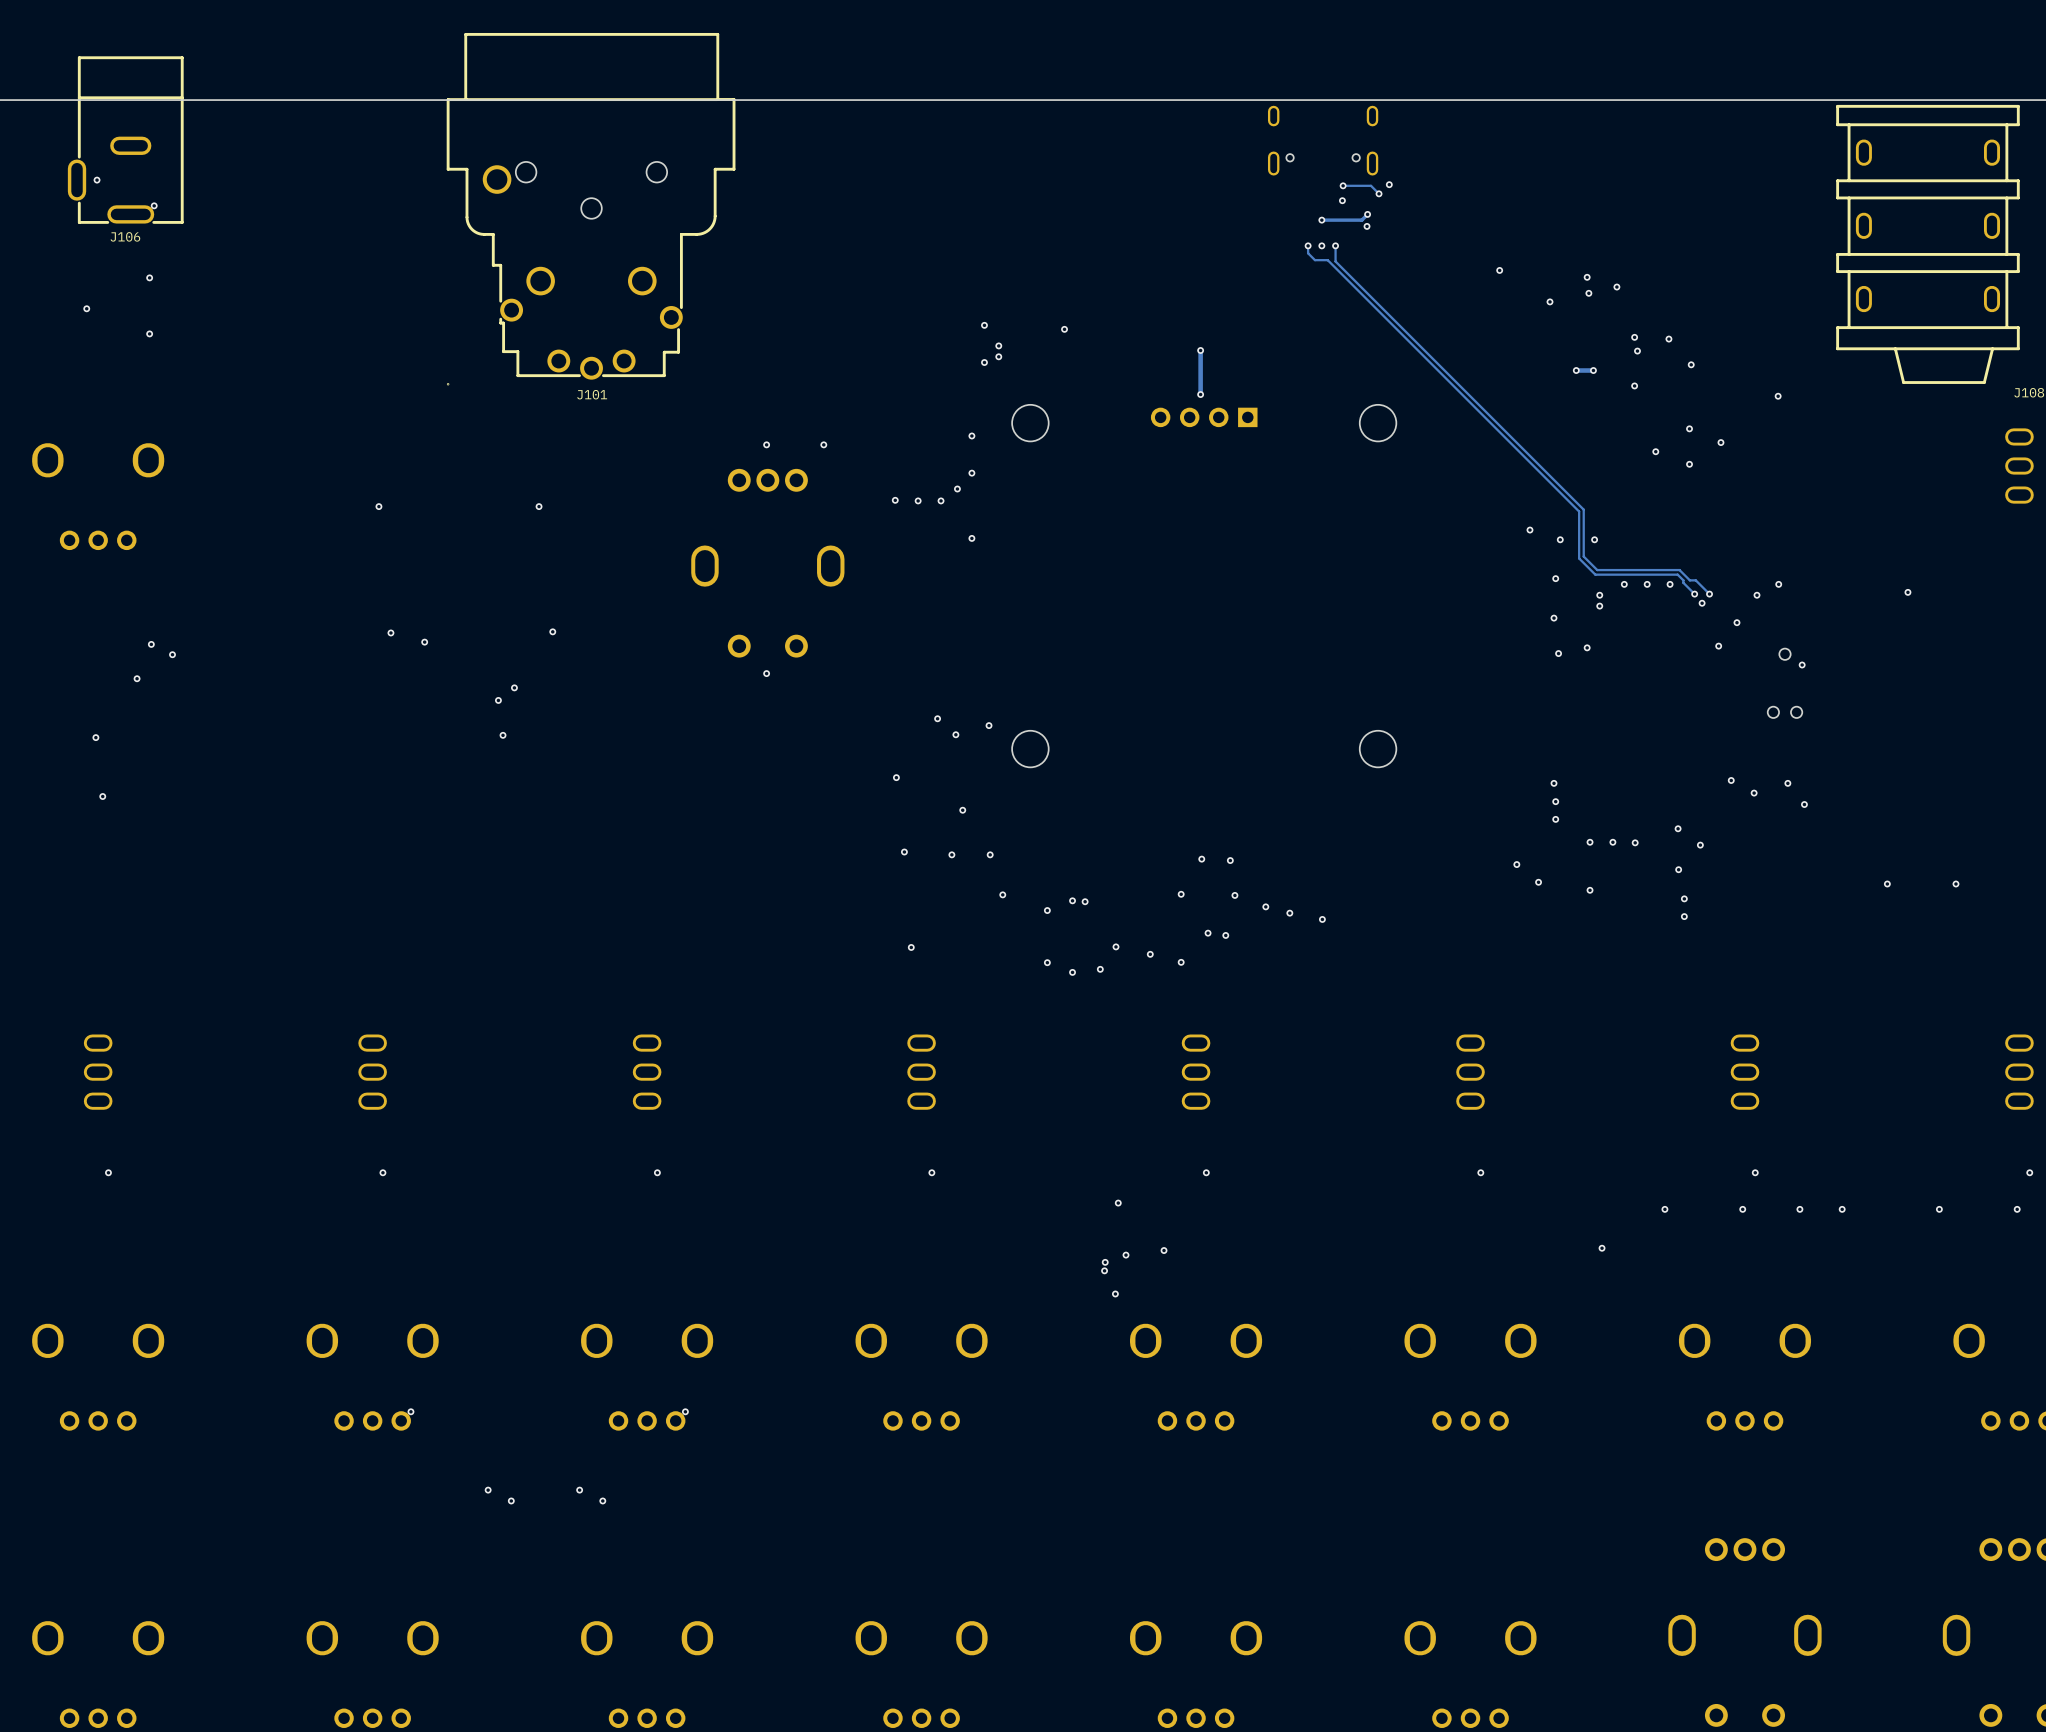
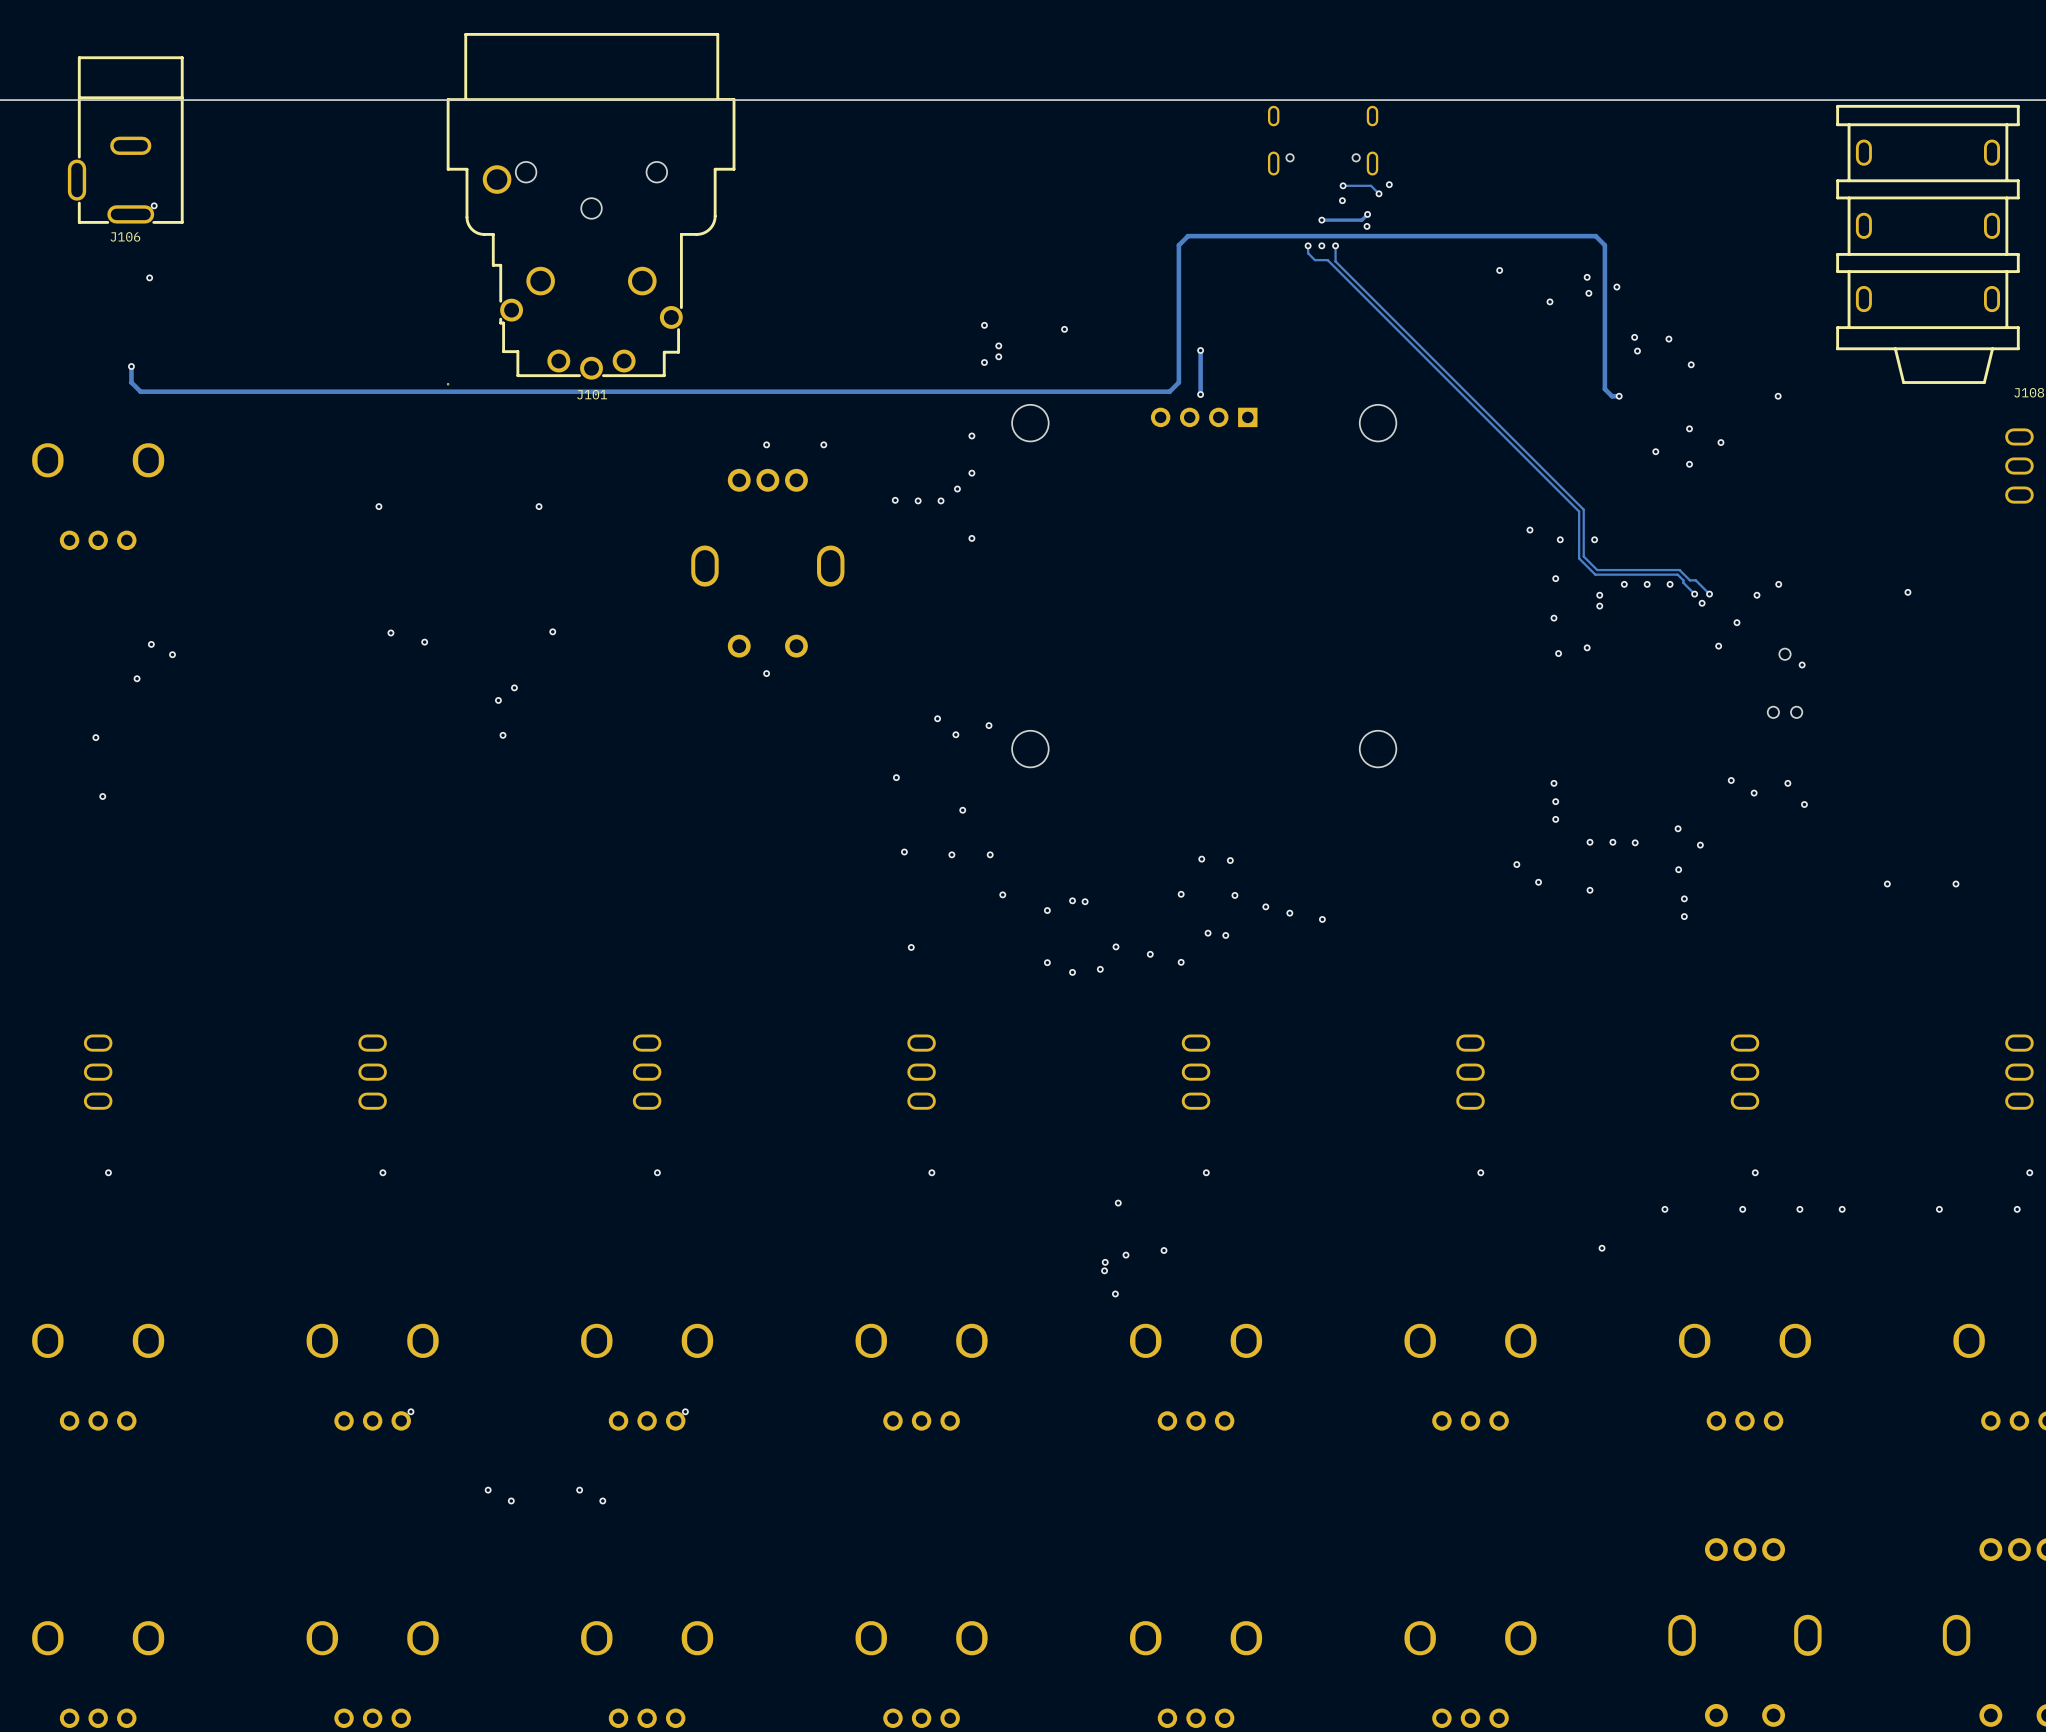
via: (97, 180) -> none
via: (86, 308) -> none
via: (149, 333) -> none
track: none -> (131, 366) (131, 382) (140, 391) (1169, 391) (1178, 382) (1178, 245) (1188, 236) (1595, 236) (1604, 245) (1604, 389) (1612, 396) (1619, 396)
via: none -> (131, 366)
via: (1576, 370) -> none
track: (1593, 370) (1576, 370) -> none
via: (1593, 370) -> none
via: (1634, 385) -> none
via: none -> (1619, 396)

